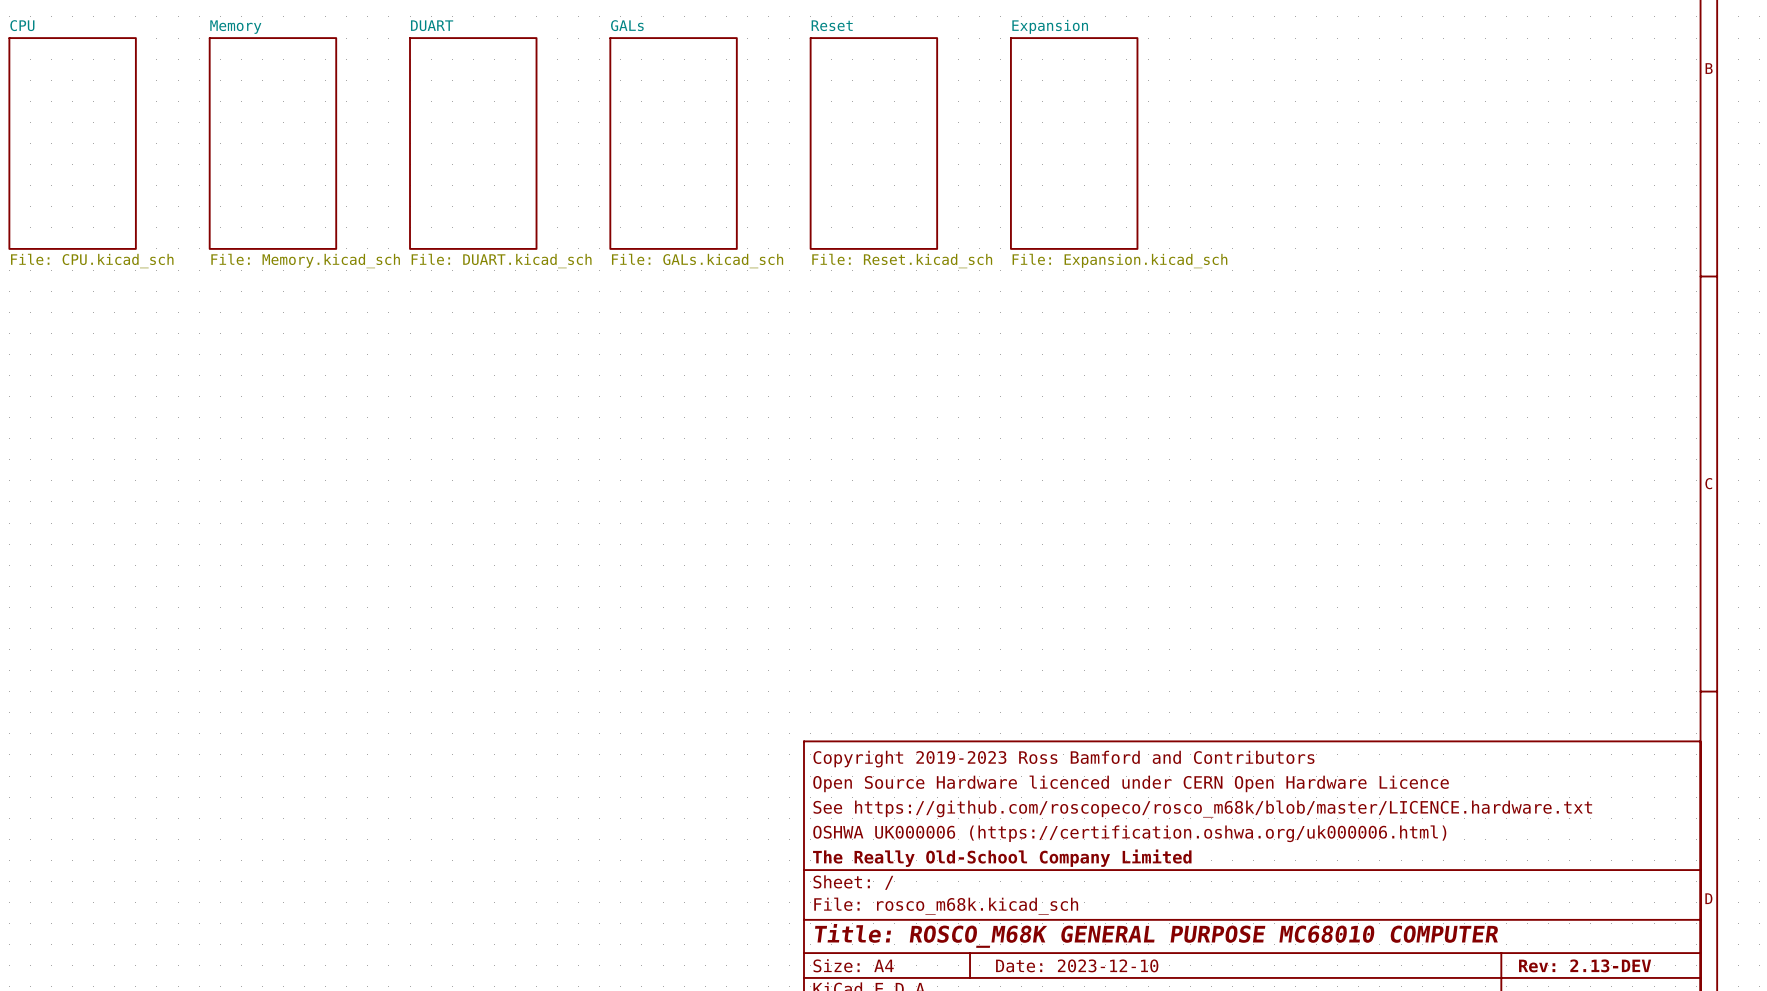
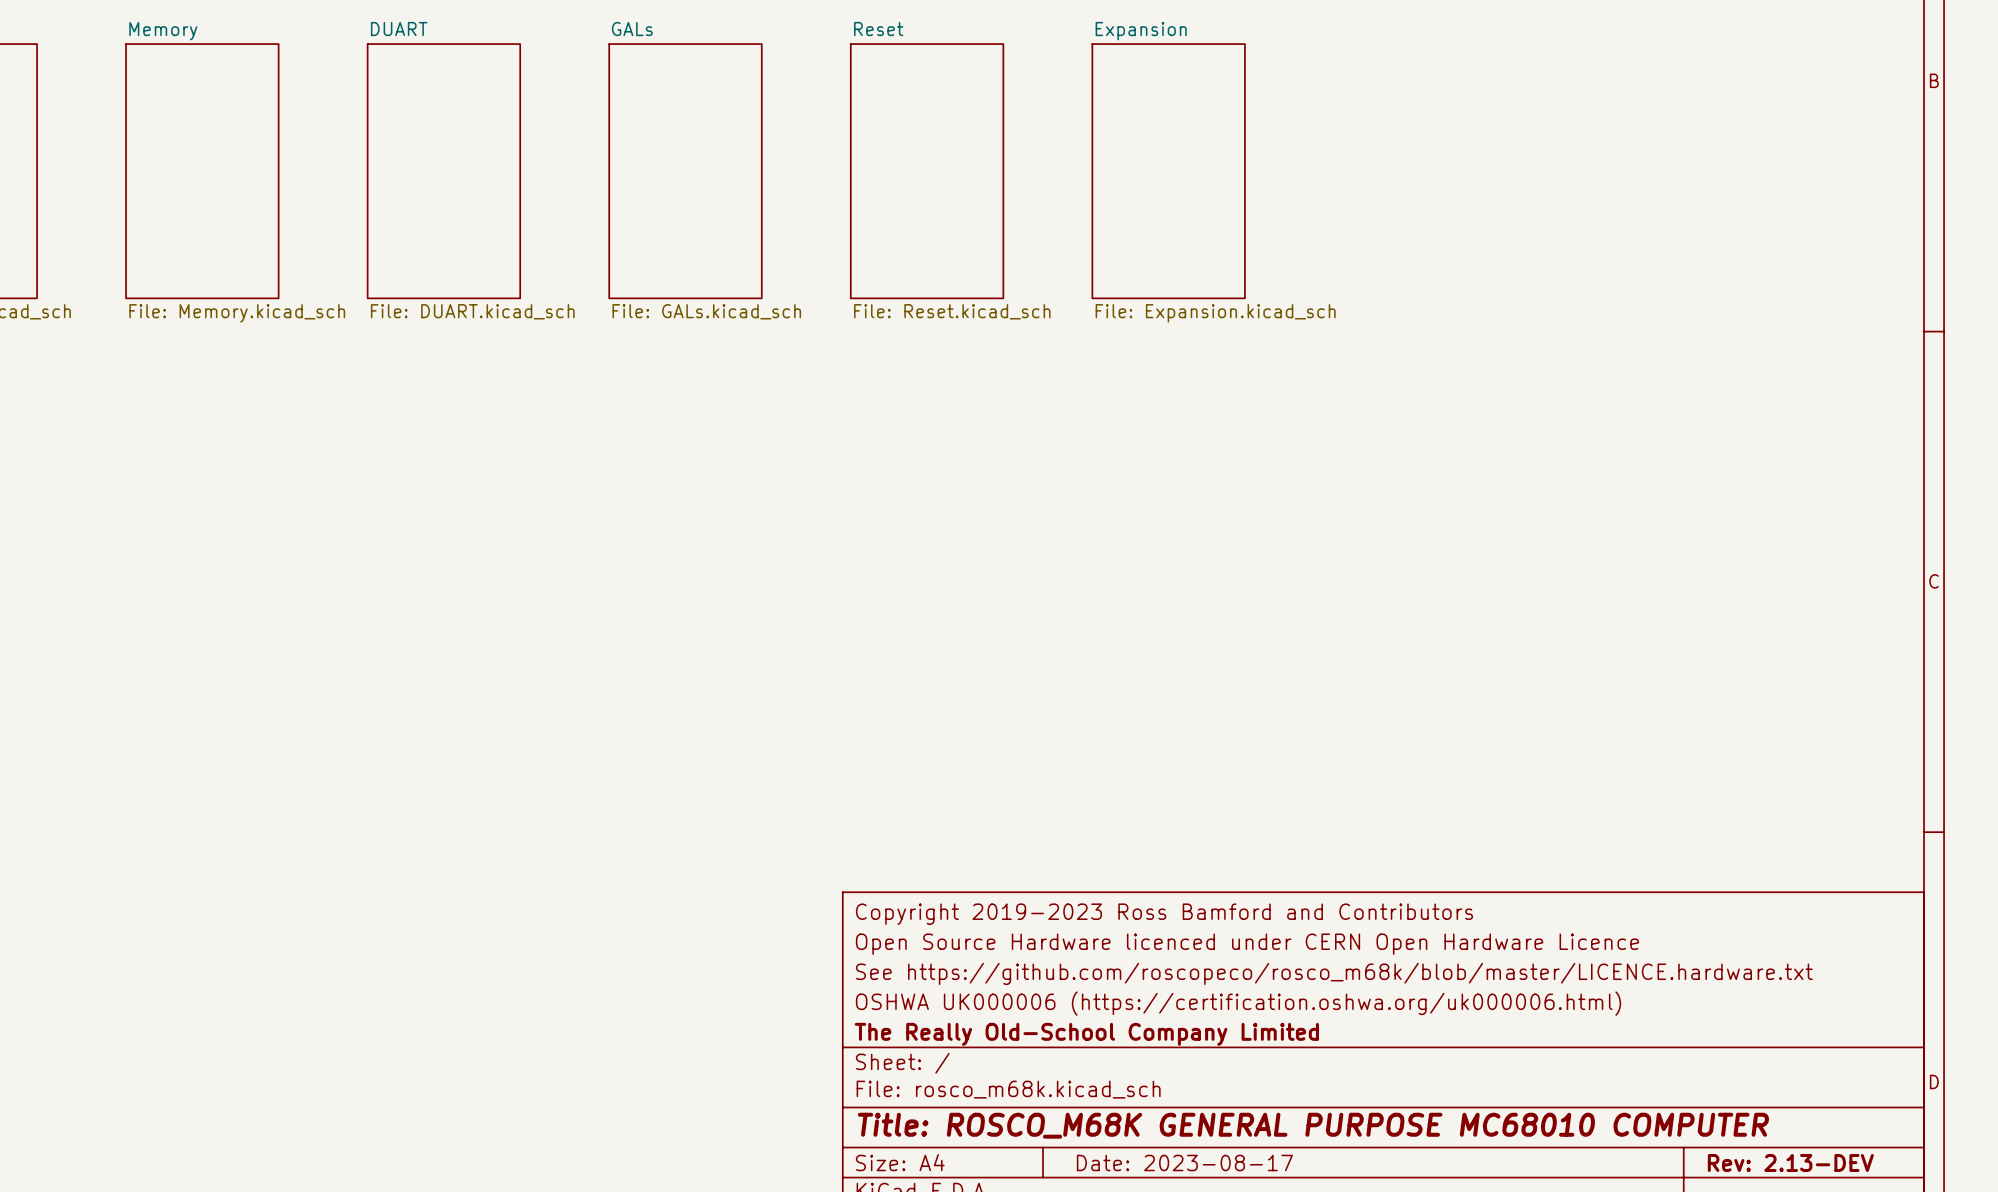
title block: Date: 2023-12-10 (1077, 965) -> Date: 2023-08-17 (1184, 1162)

